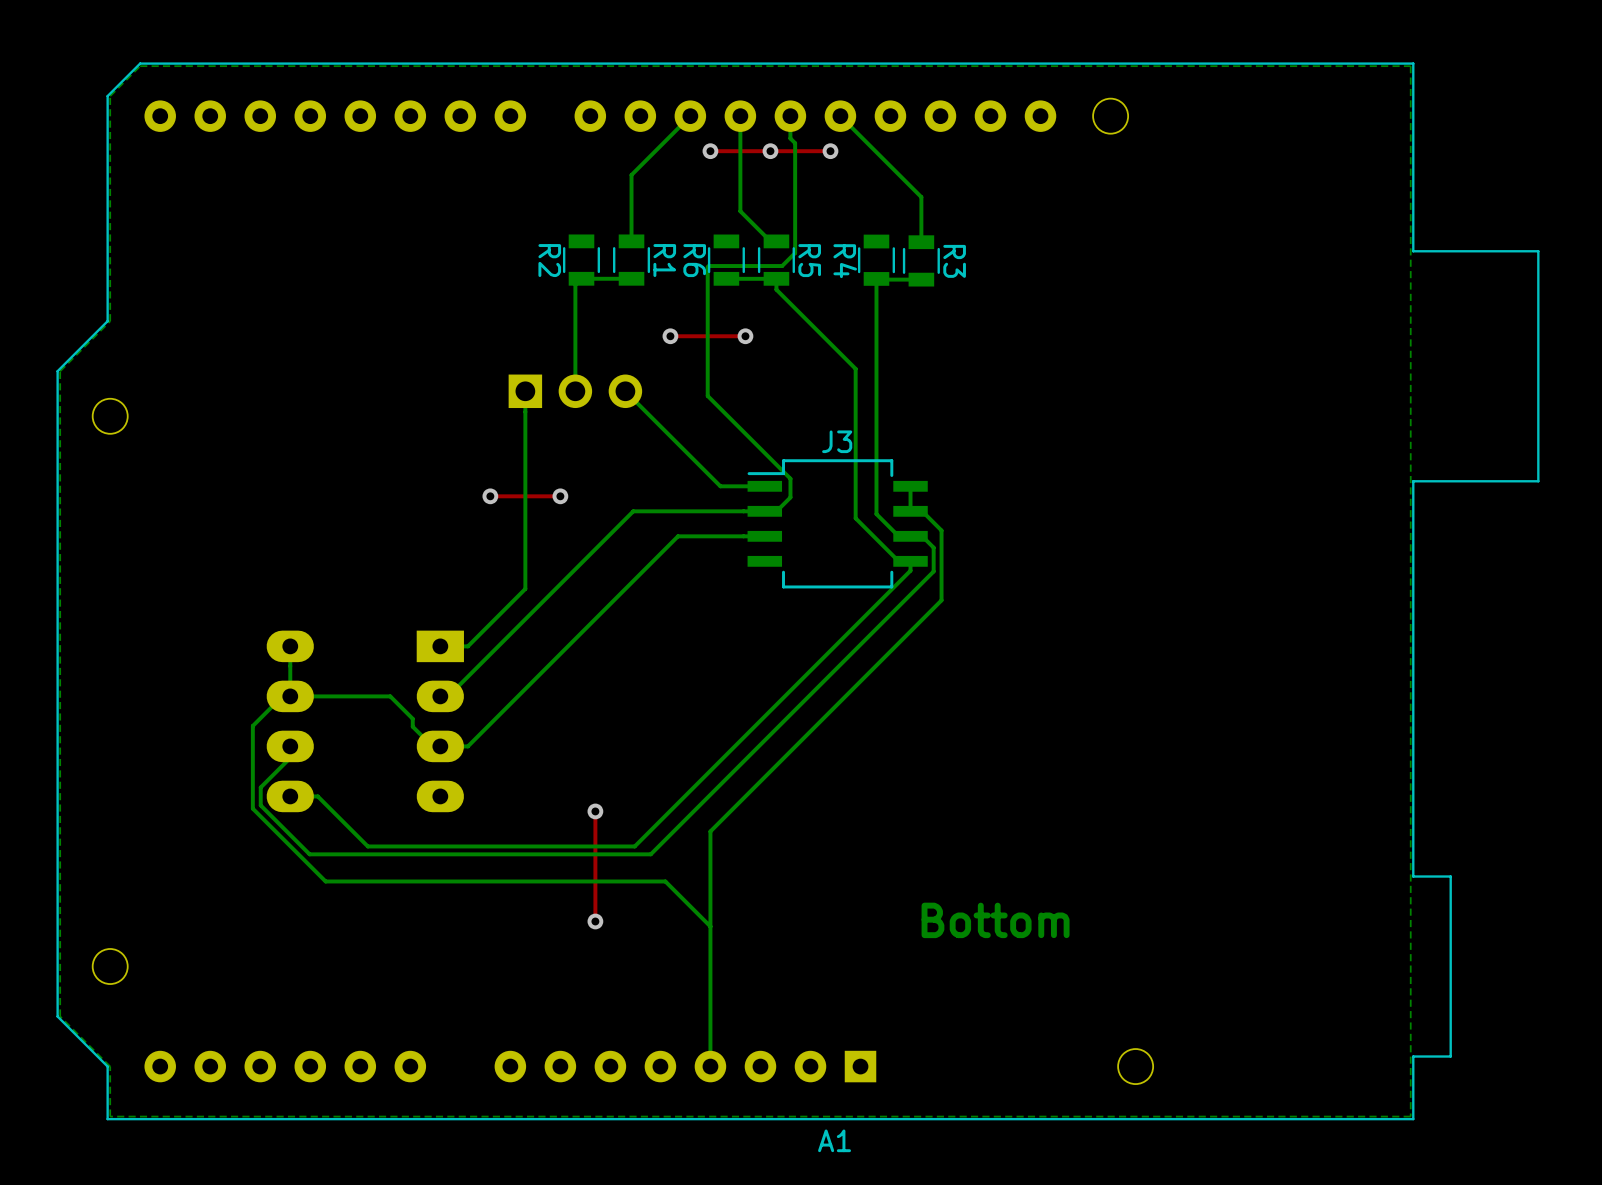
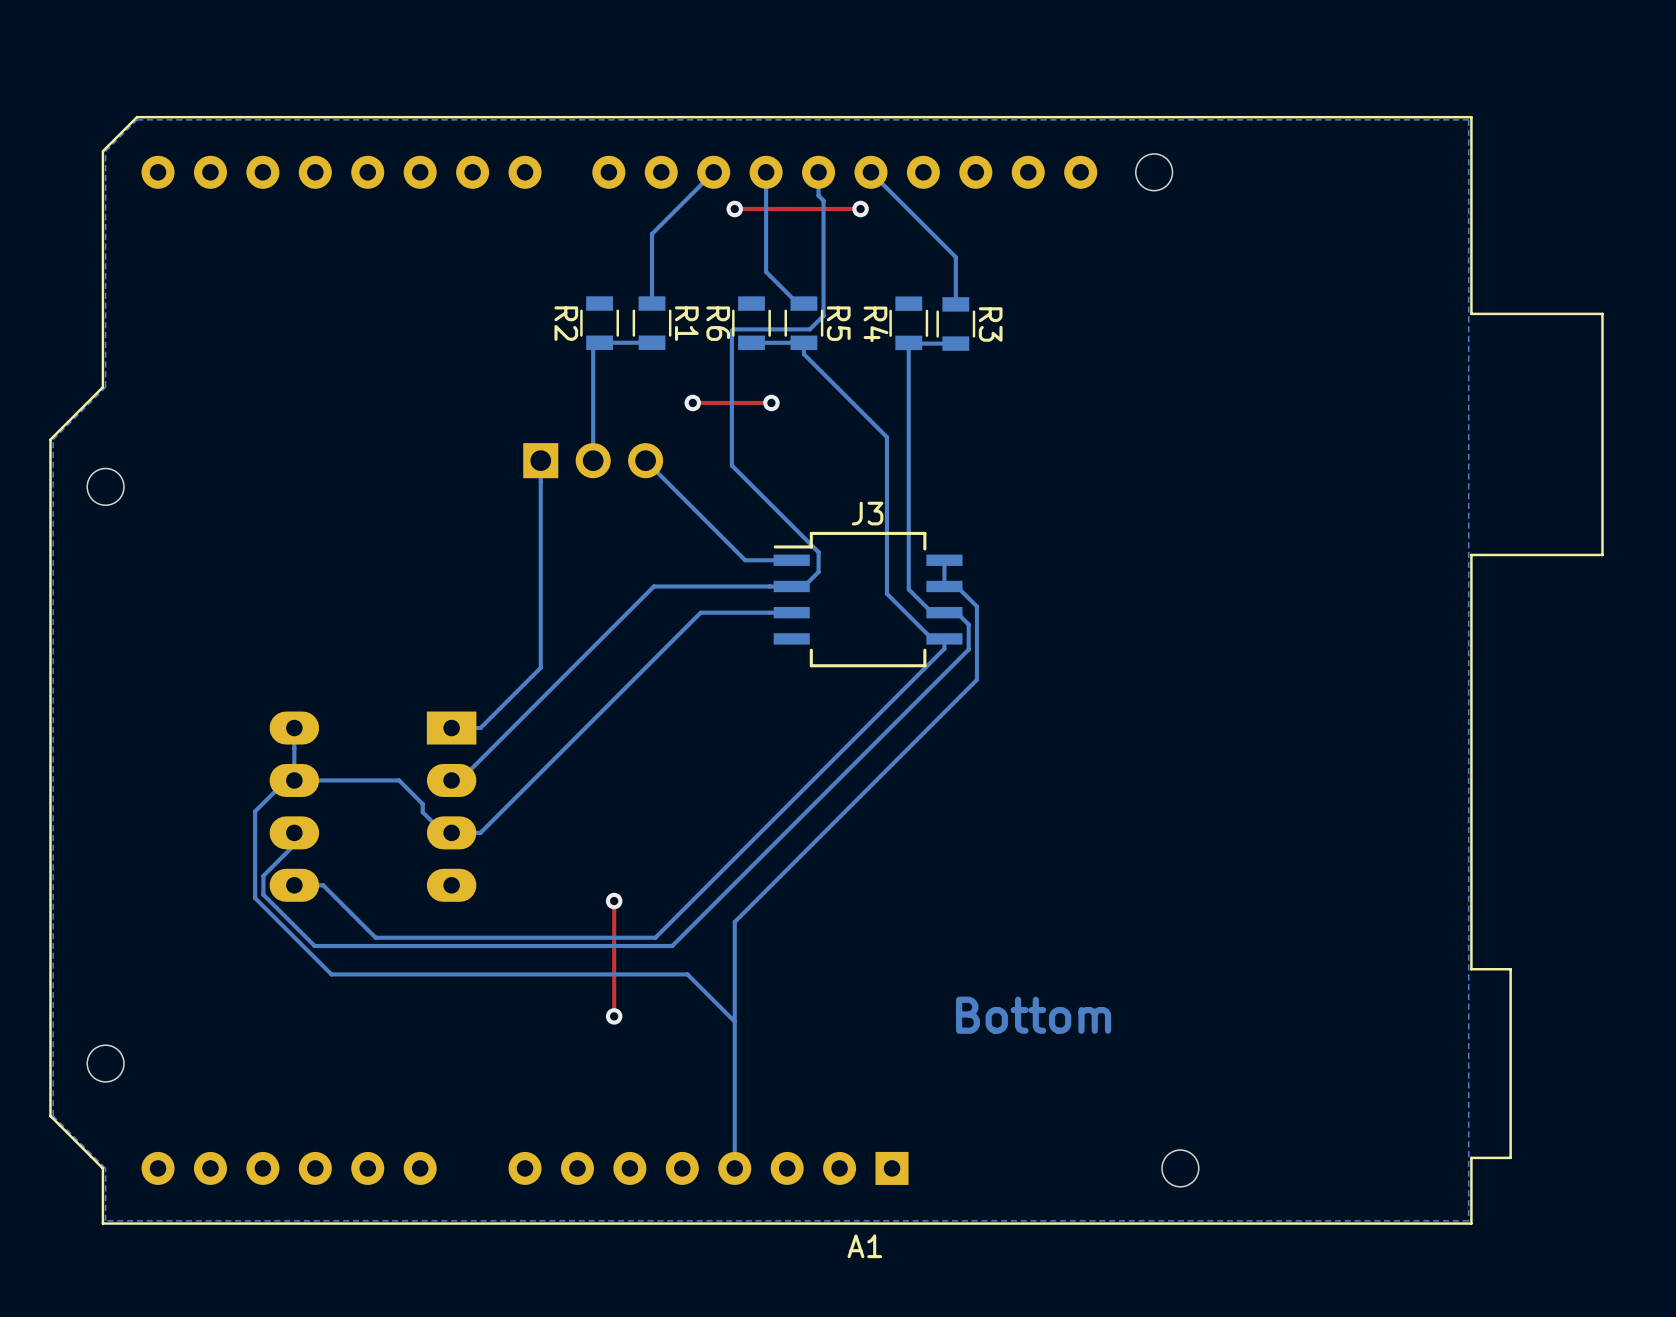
via: (770, 151) -> none
via: (490, 496) -> none
top track: (560, 496) (490, 496) -> none
via: (560, 496) -> none

